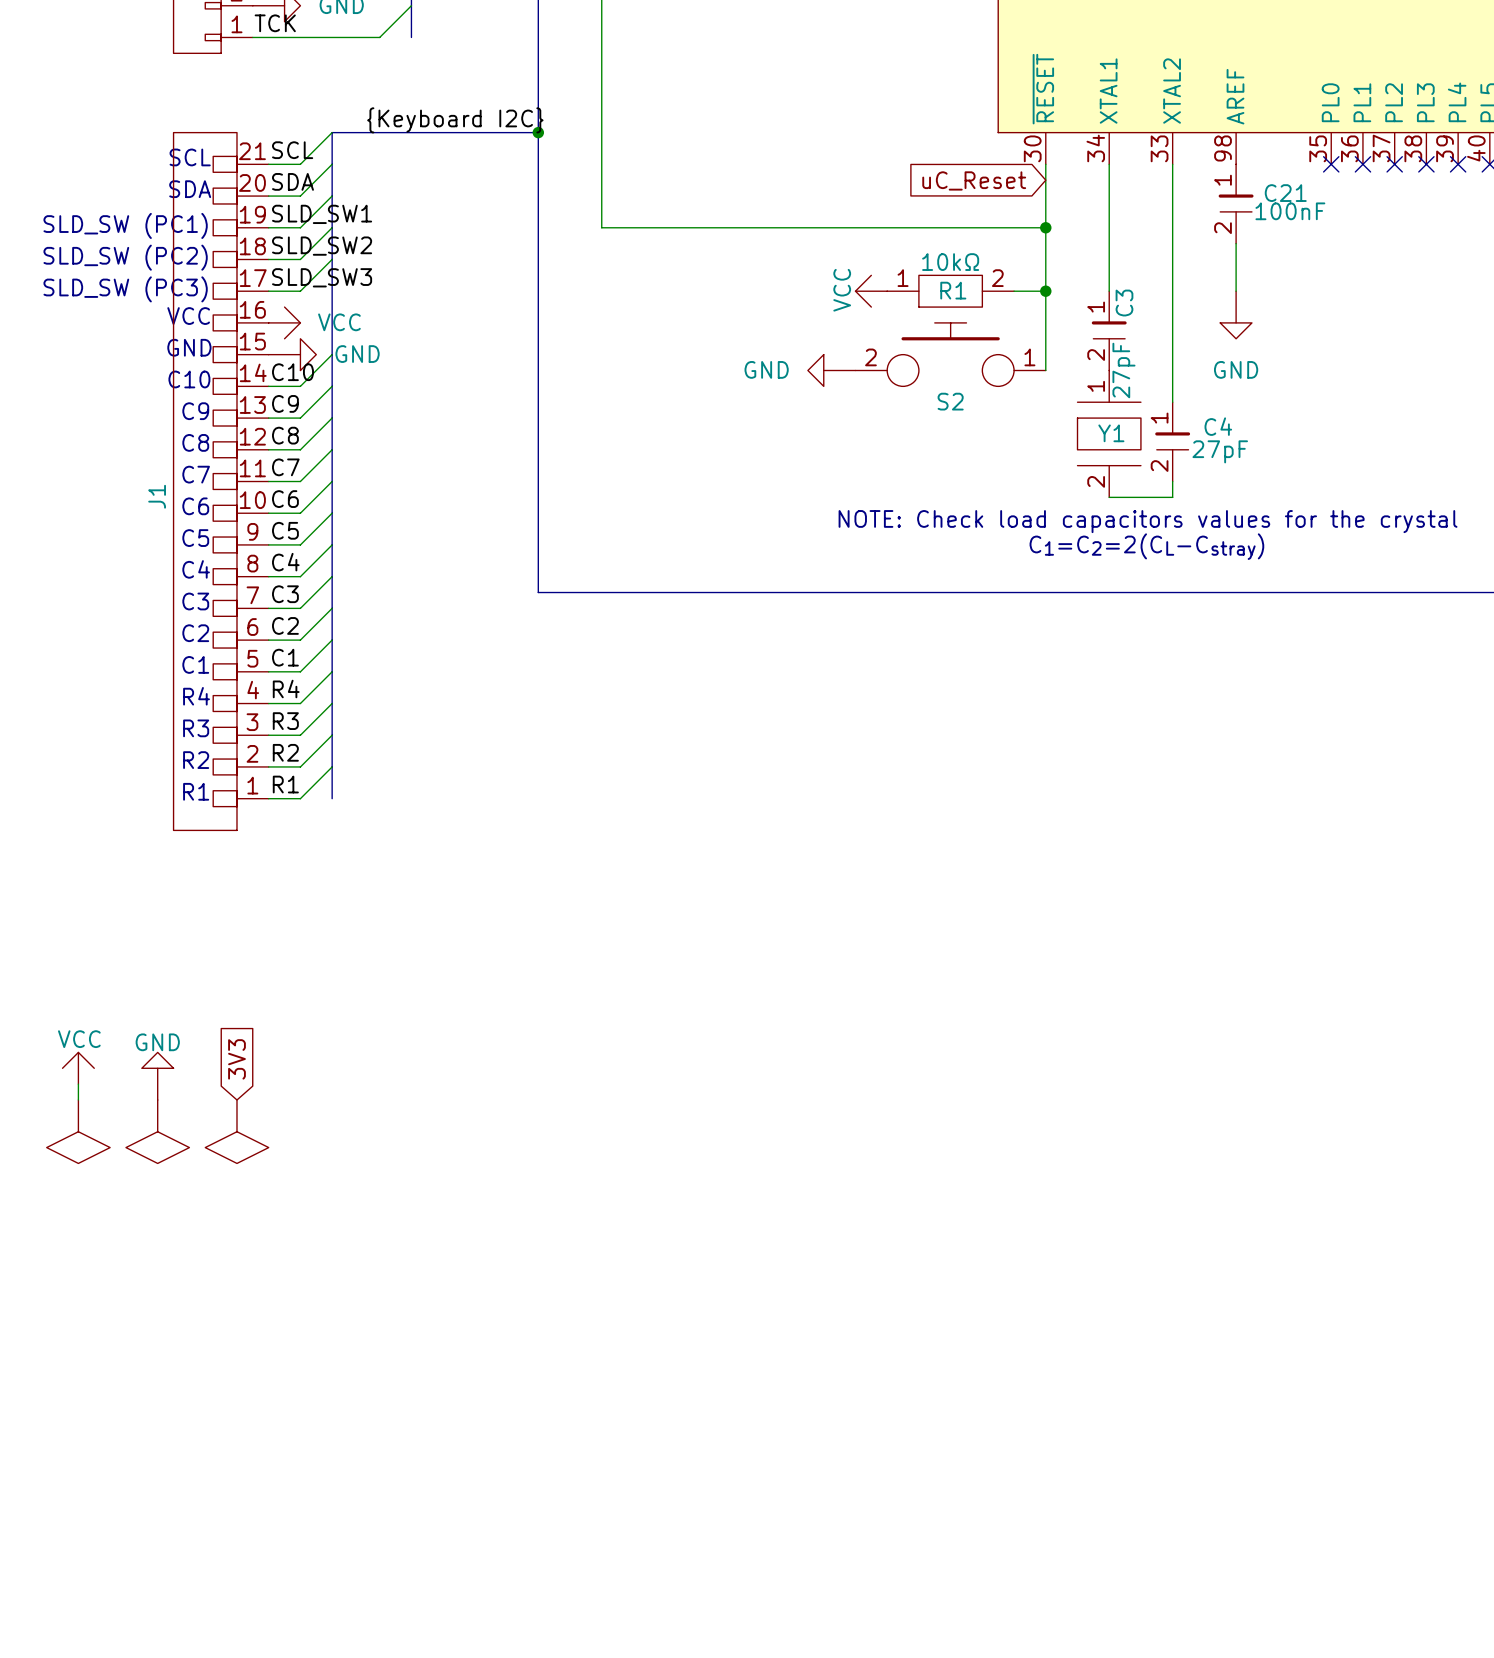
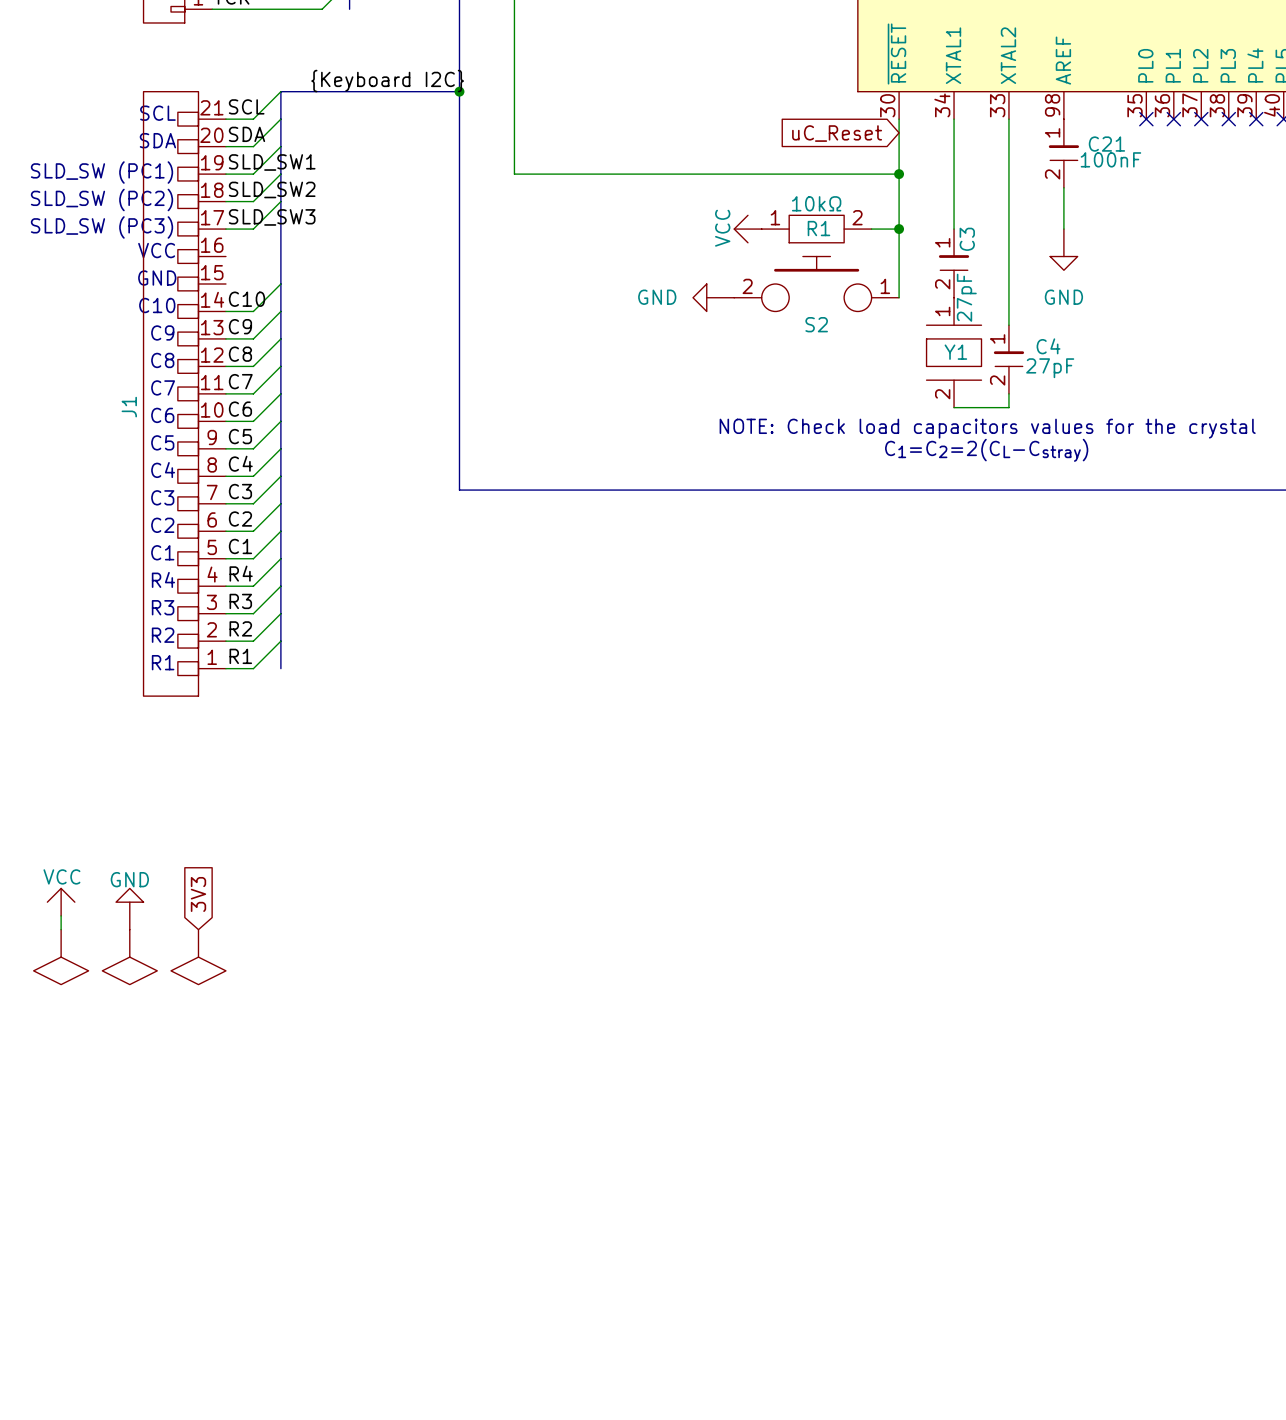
power symbol: VCC (284, 322) -> none
power symbol: GND (292, 354) -> none

